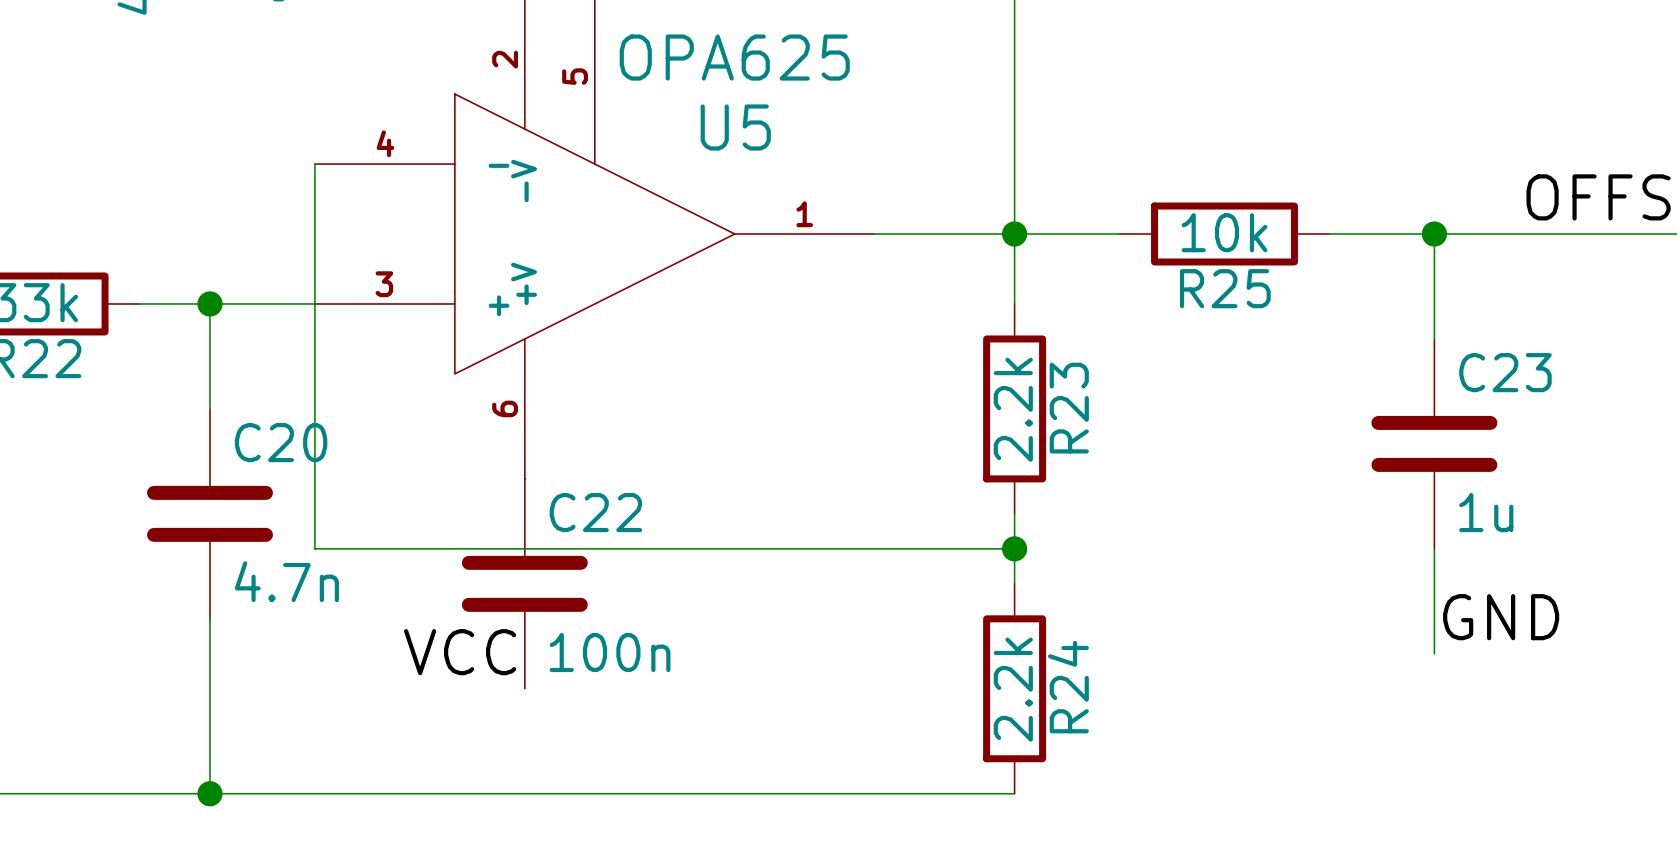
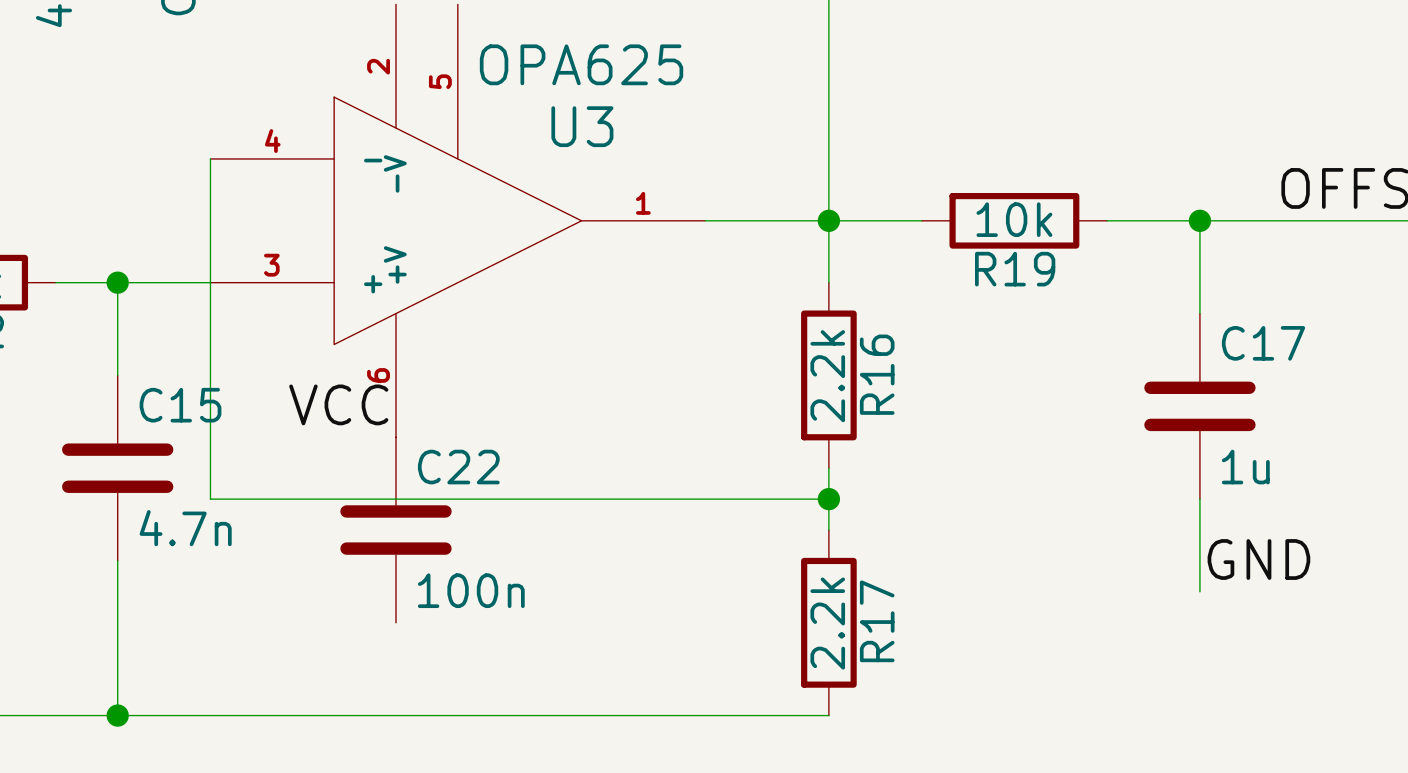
U5 name: U5 (735, 127) -> U3 (582, 126)
R25 name: R25 (1225, 288) -> R19 (1015, 269)
C23 name: C23 (1505, 372) -> C17 (1263, 343)
R23 name: R23 (1069, 408) -> R16 (877, 374)
C20 name: C20 (281, 442) -> C15 (180, 405)
label position: VCC (460, 652) -> VCC (338, 404)
R24 name: R24 (1068, 687) -> R17 (877, 621)

